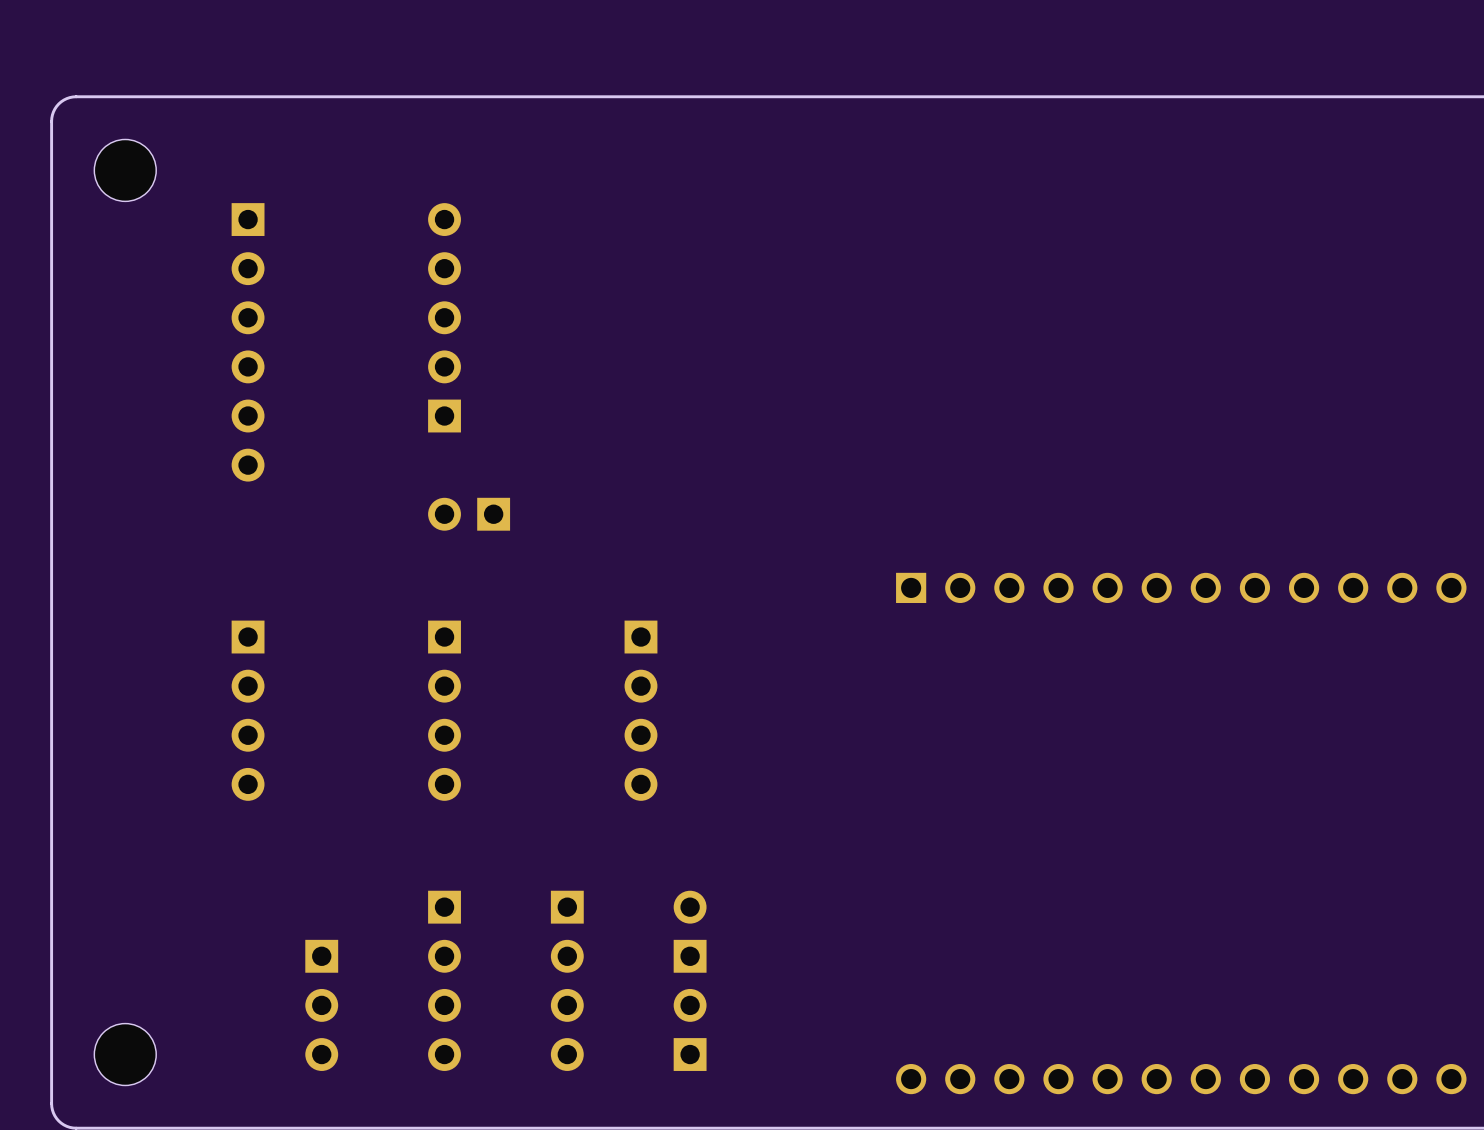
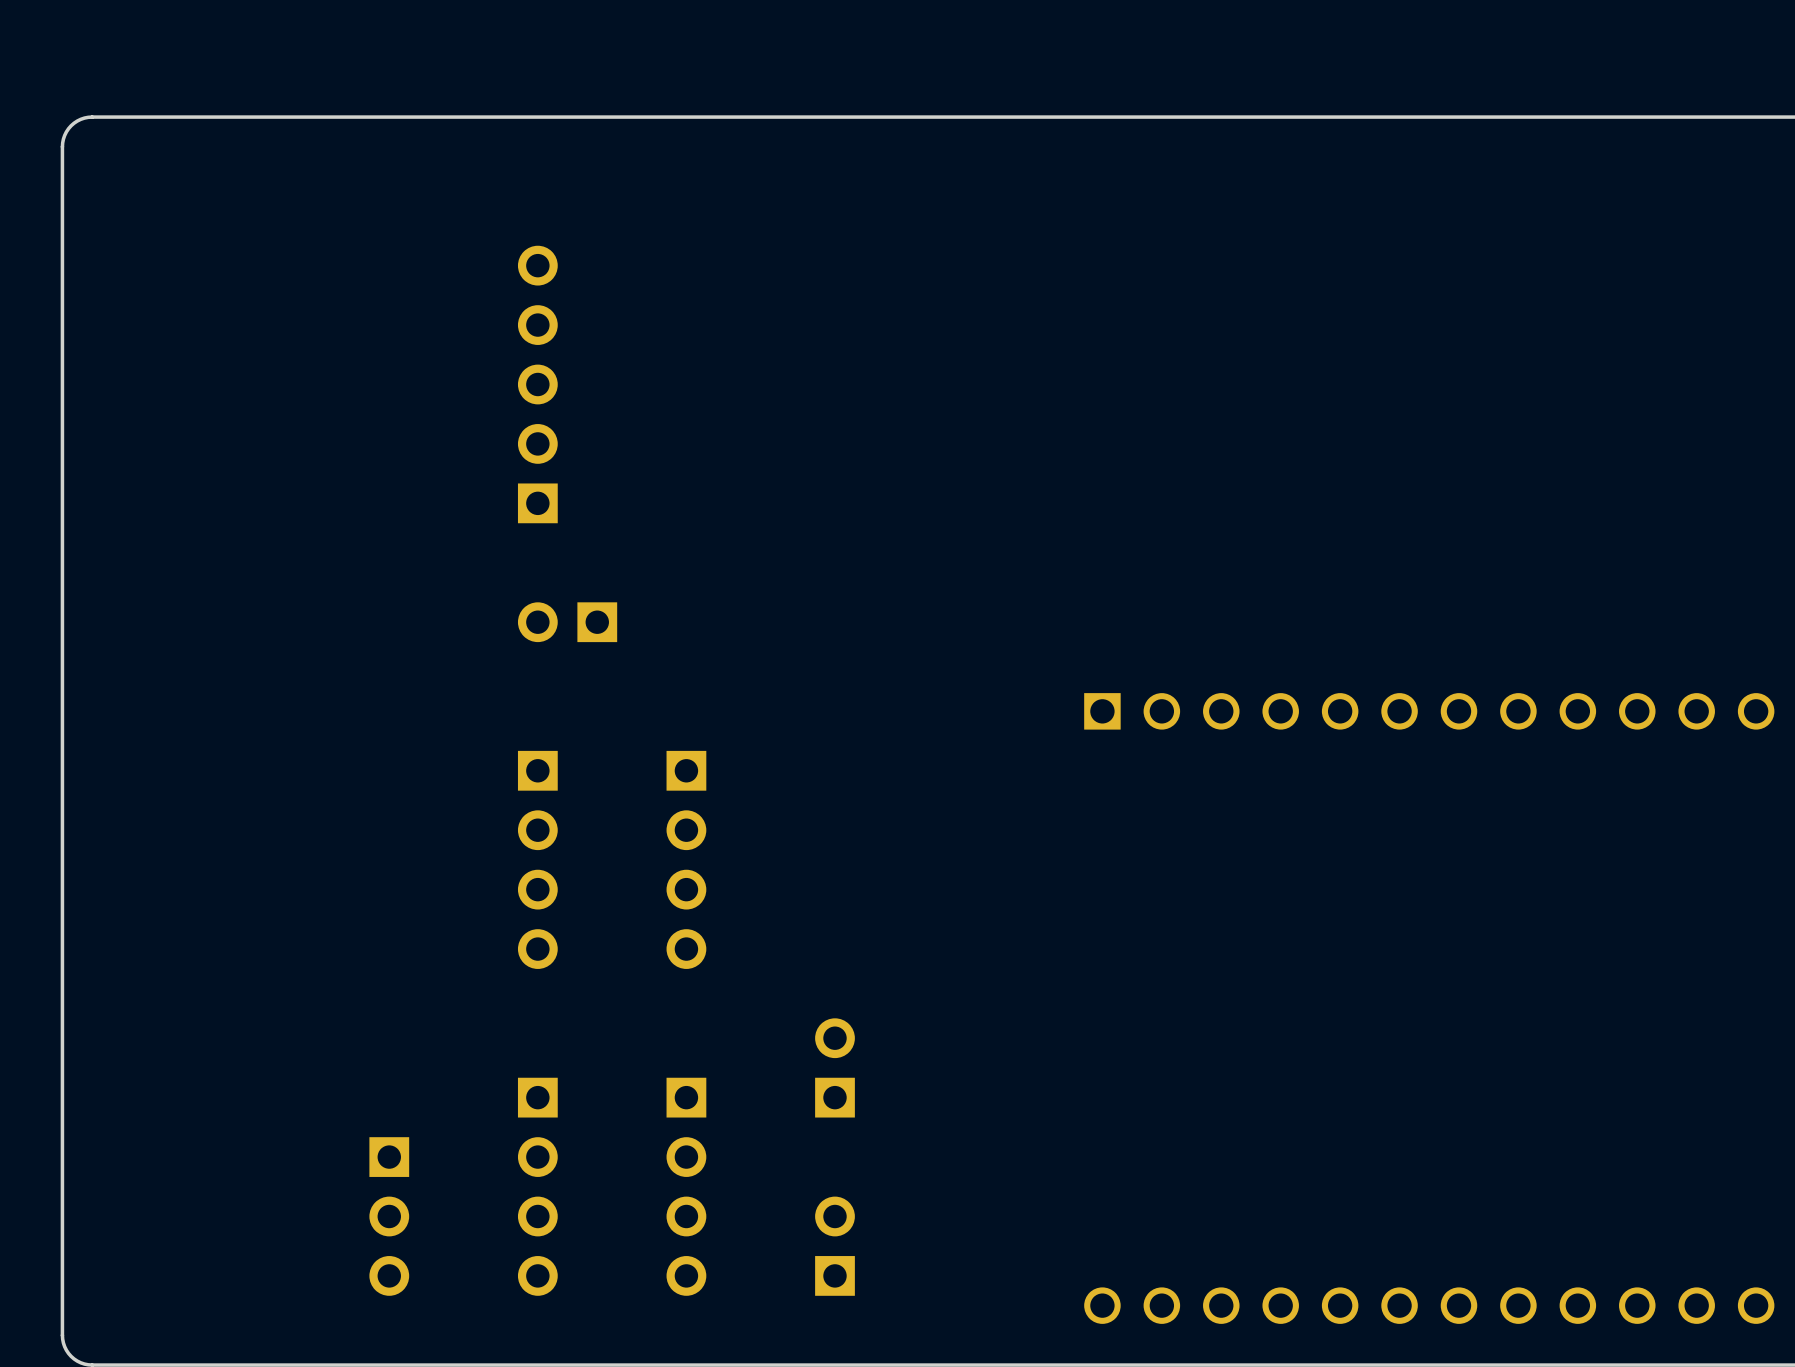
part: (125, 170) -> none
part: (248, 342) -> none
part: (248, 710) -> none
part position: (640, 710) -> (686, 859)
part position: (690, 931) -> (834, 1067)
part: (125, 1054) -> none

